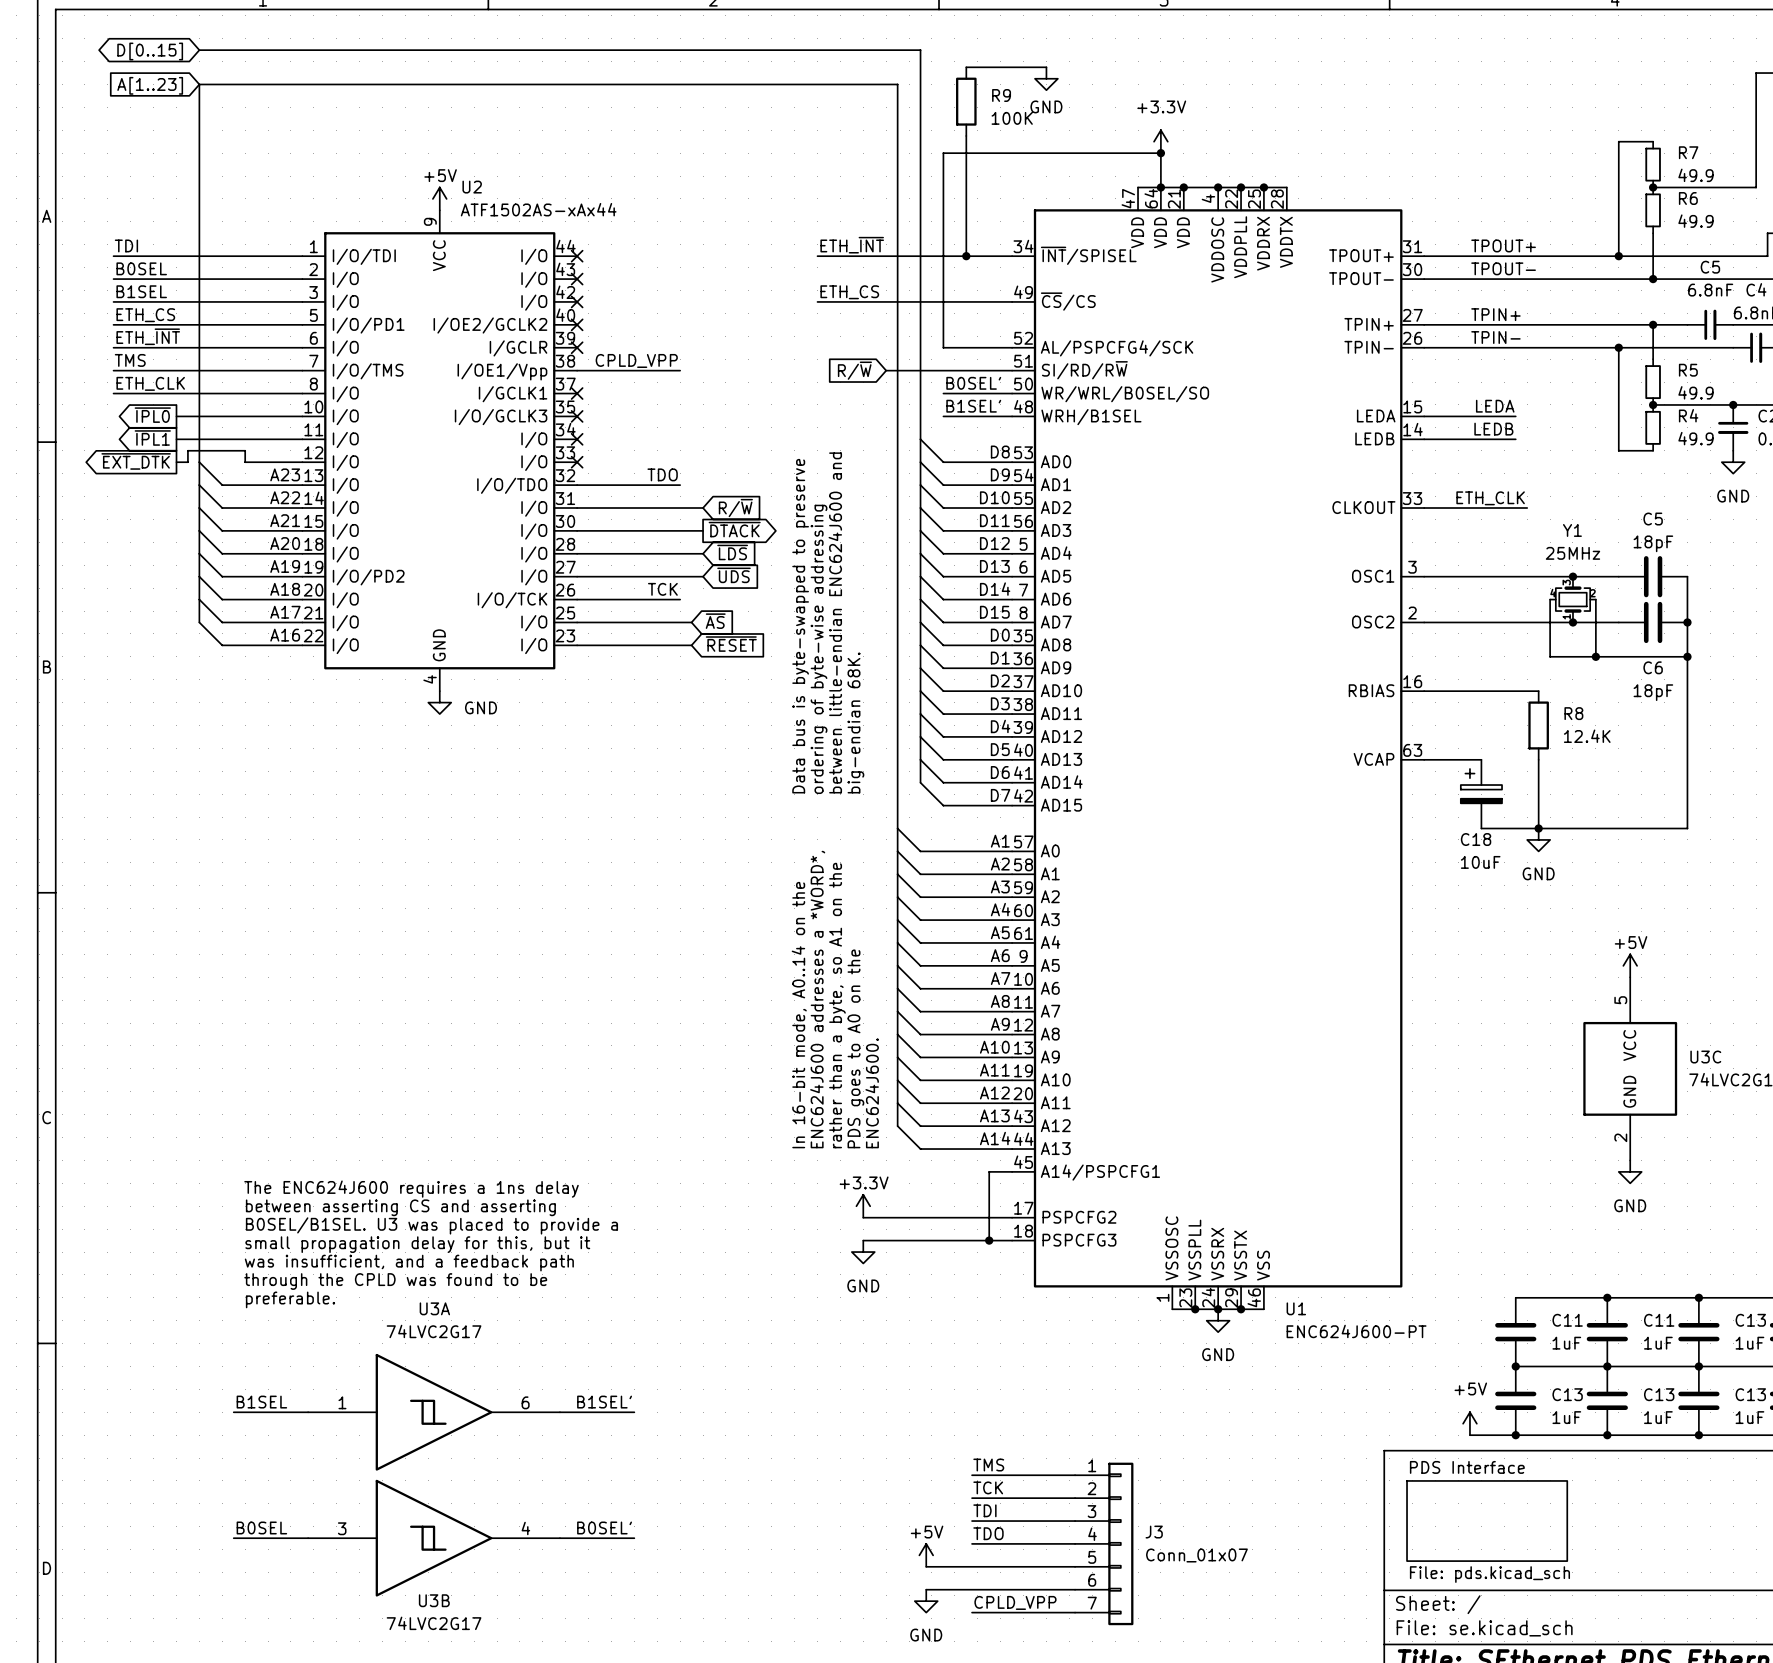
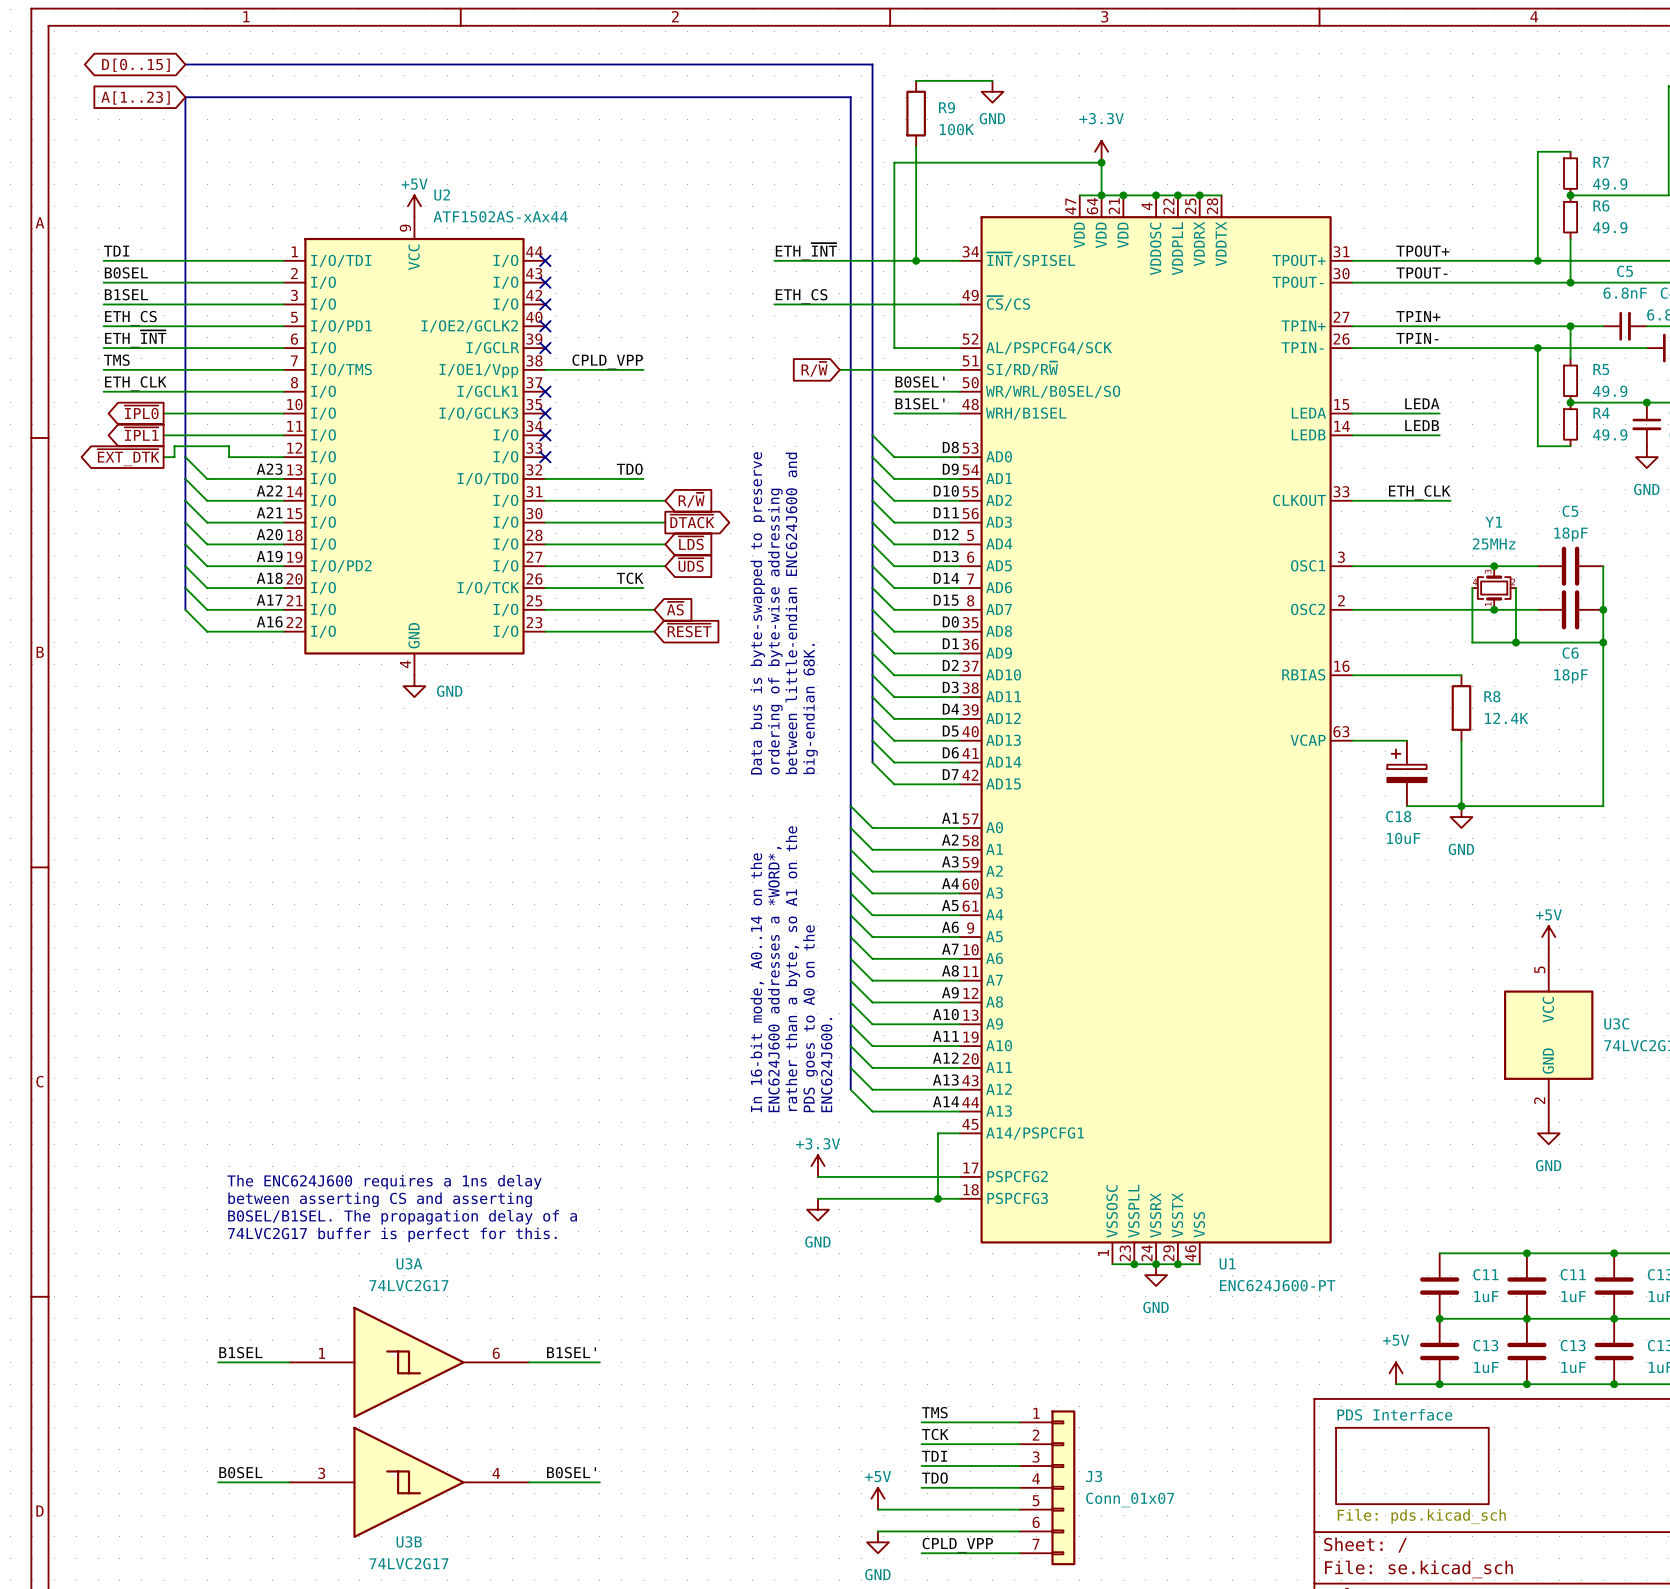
text: The ENC624J600 requires a 1ns delay (411, 1189) -> none
text: between asserting CS and asserting (400, 1207) -> none
text: B0SEL/B1SEL. U3 was placed to provide a (431, 1225) -> The ENC624J600 requires a 1ns delay (384, 1182)
text: small propagation delay for this, but it (417, 1244) -> between asserting CS and asserting (380, 1199)
text: was insufficient, and a feedback path (409, 1263) -> B0SEL/B1SEL. The propagation delay of a (402, 1217)
text: through the CPLD was found to be (395, 1281) -> 74LVC2G17 buffer is perfect for this. (392, 1234)
text: preferable. (290, 1299) -> none

